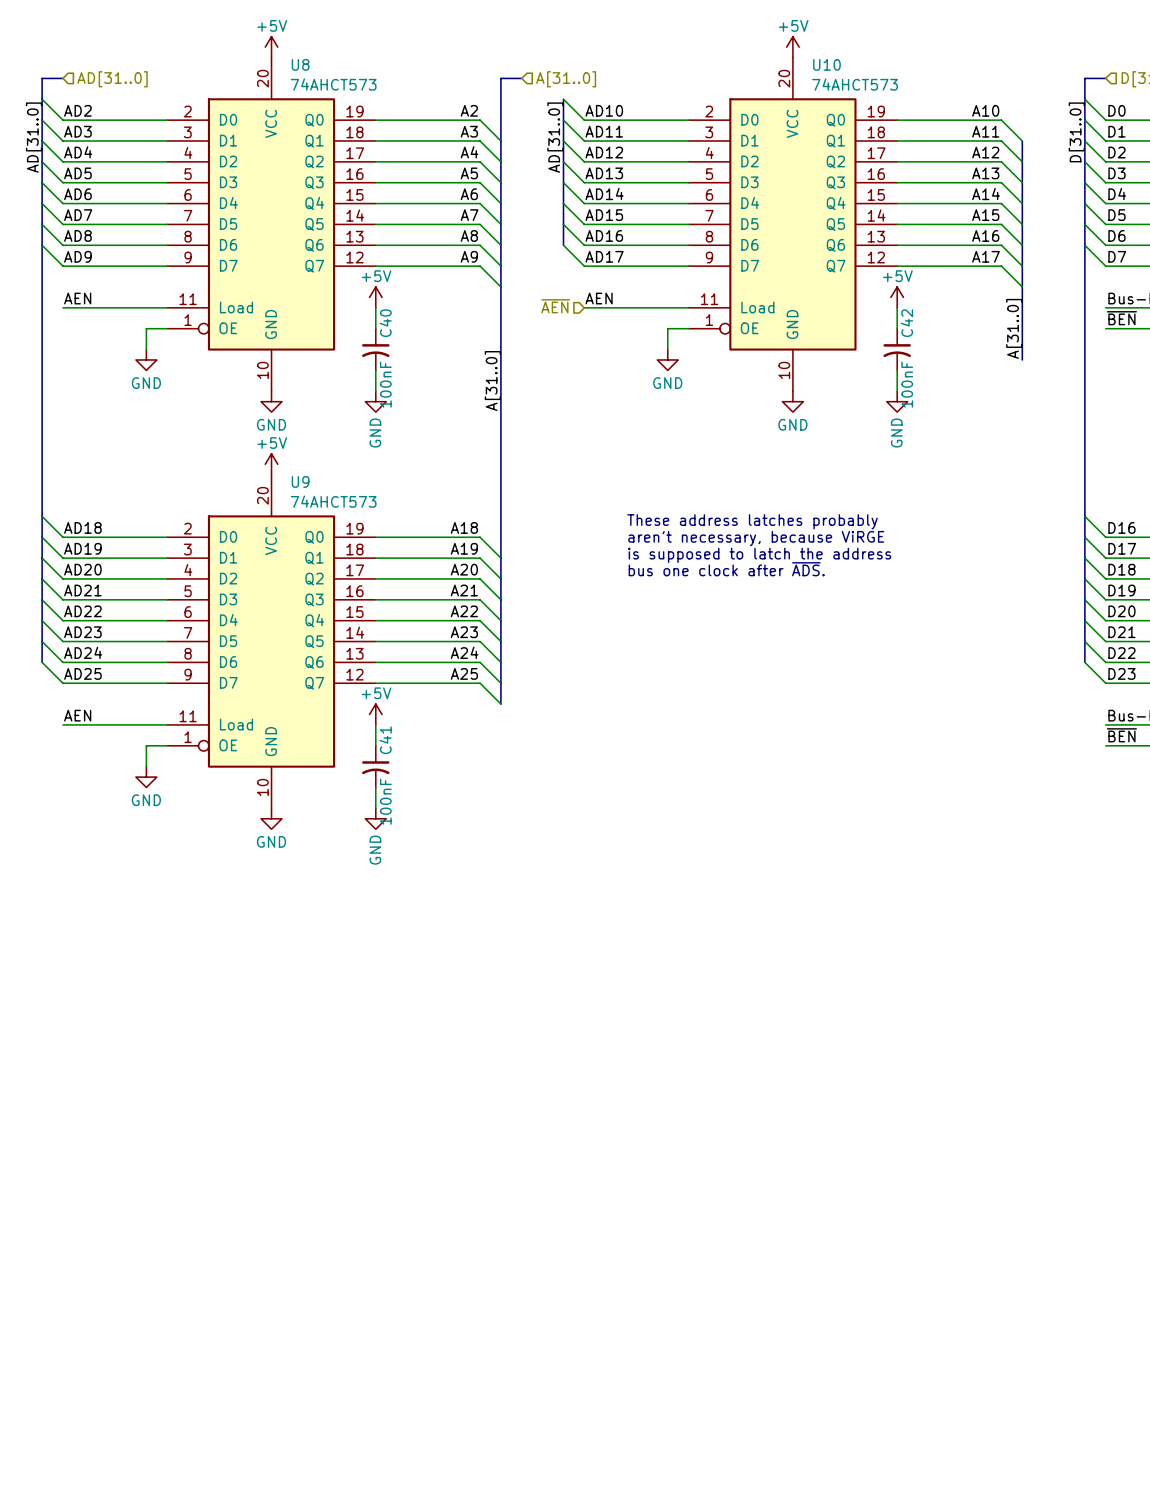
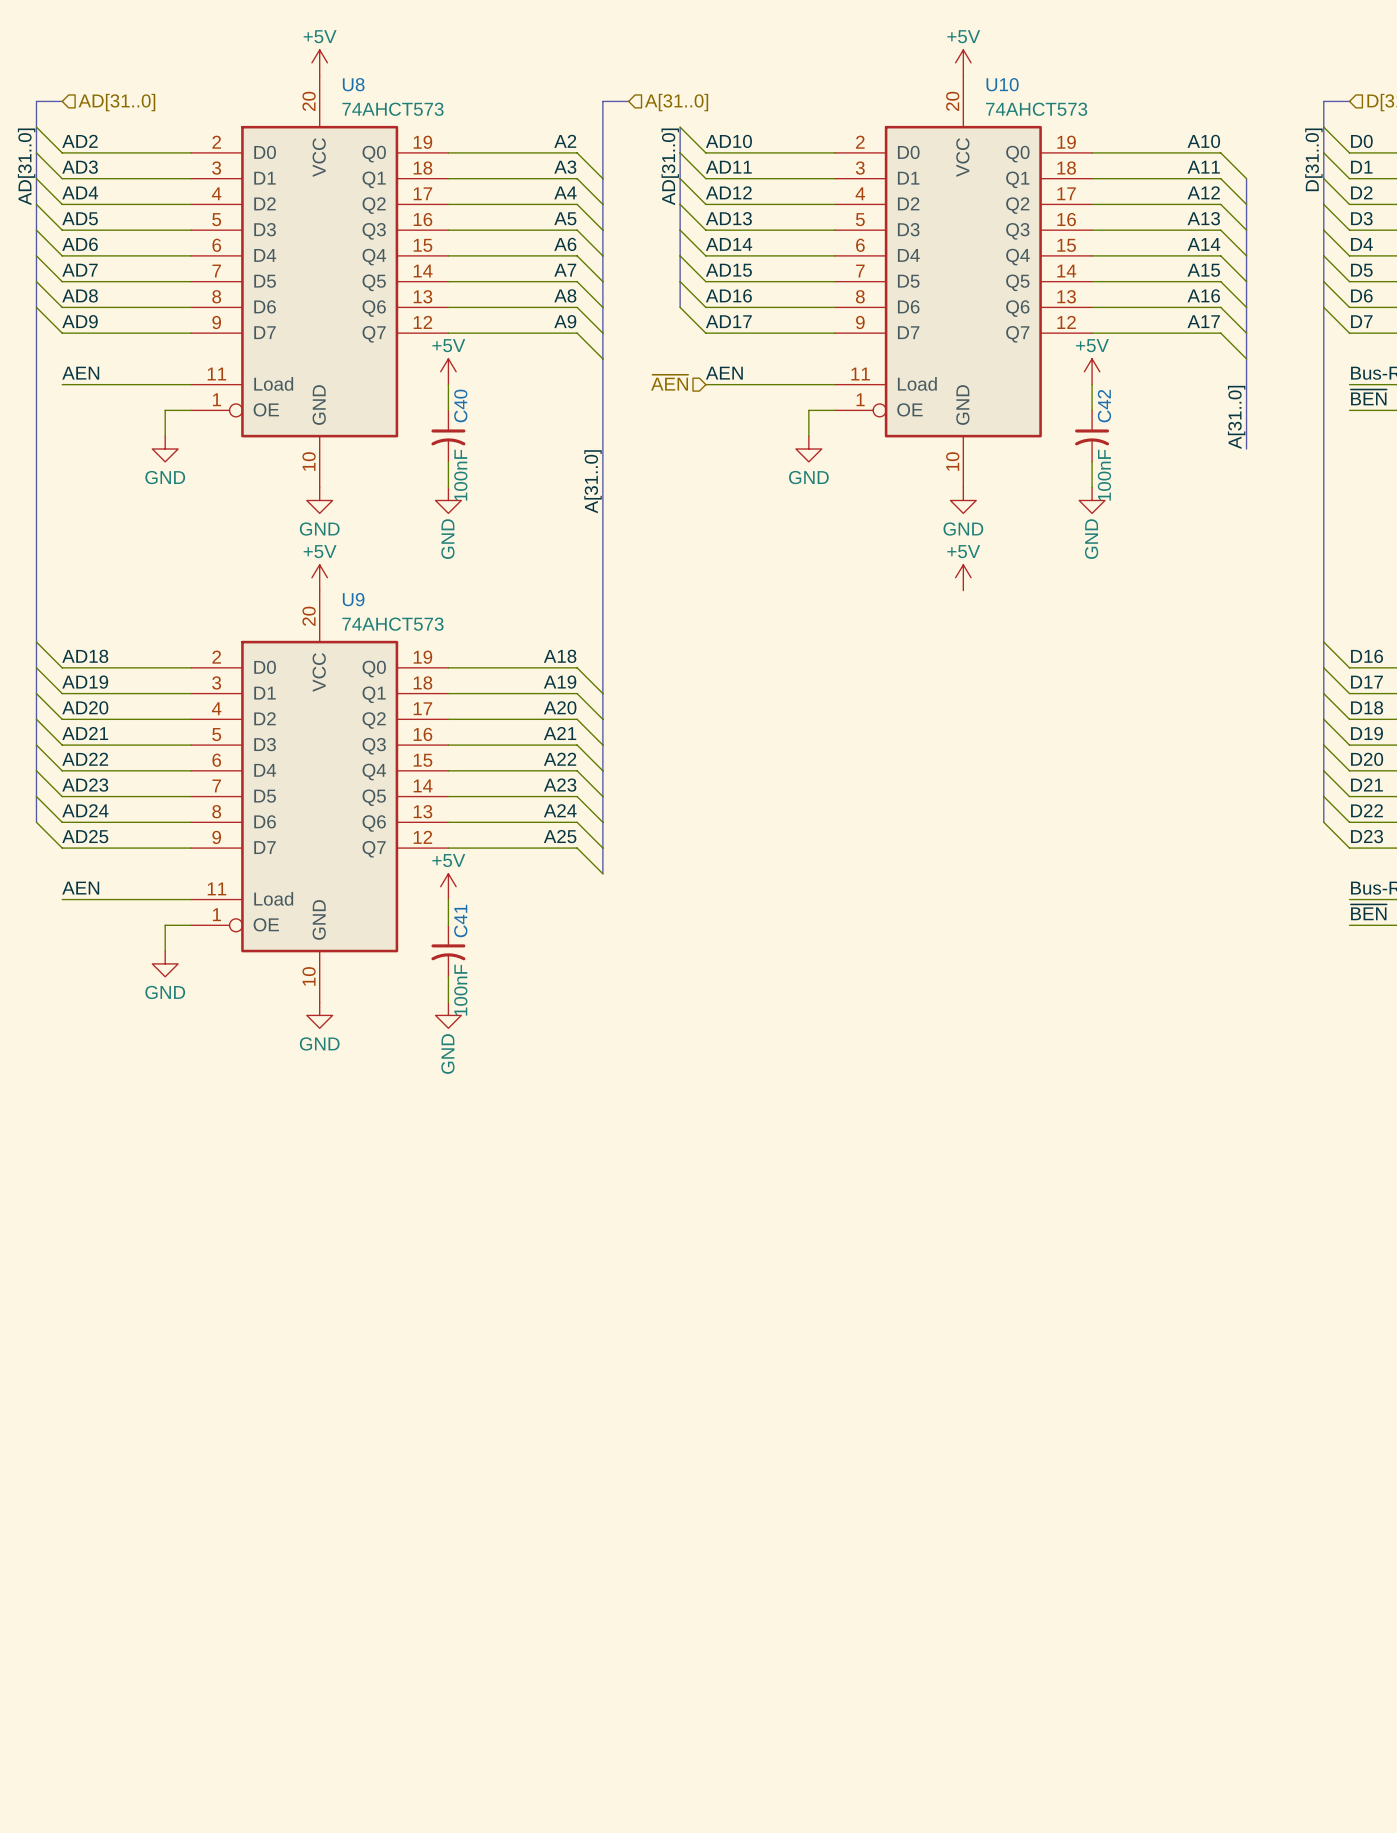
power symbol: none -> +5V (963, 577)
text: These address latches probably (752, 521) -> none
text: aren't necessary, because ViRGE (756, 538) -> none
text: is supposed to latch the address (759, 555) -> none
text: bus one clock after ~{ADS}. (726, 569) -> none

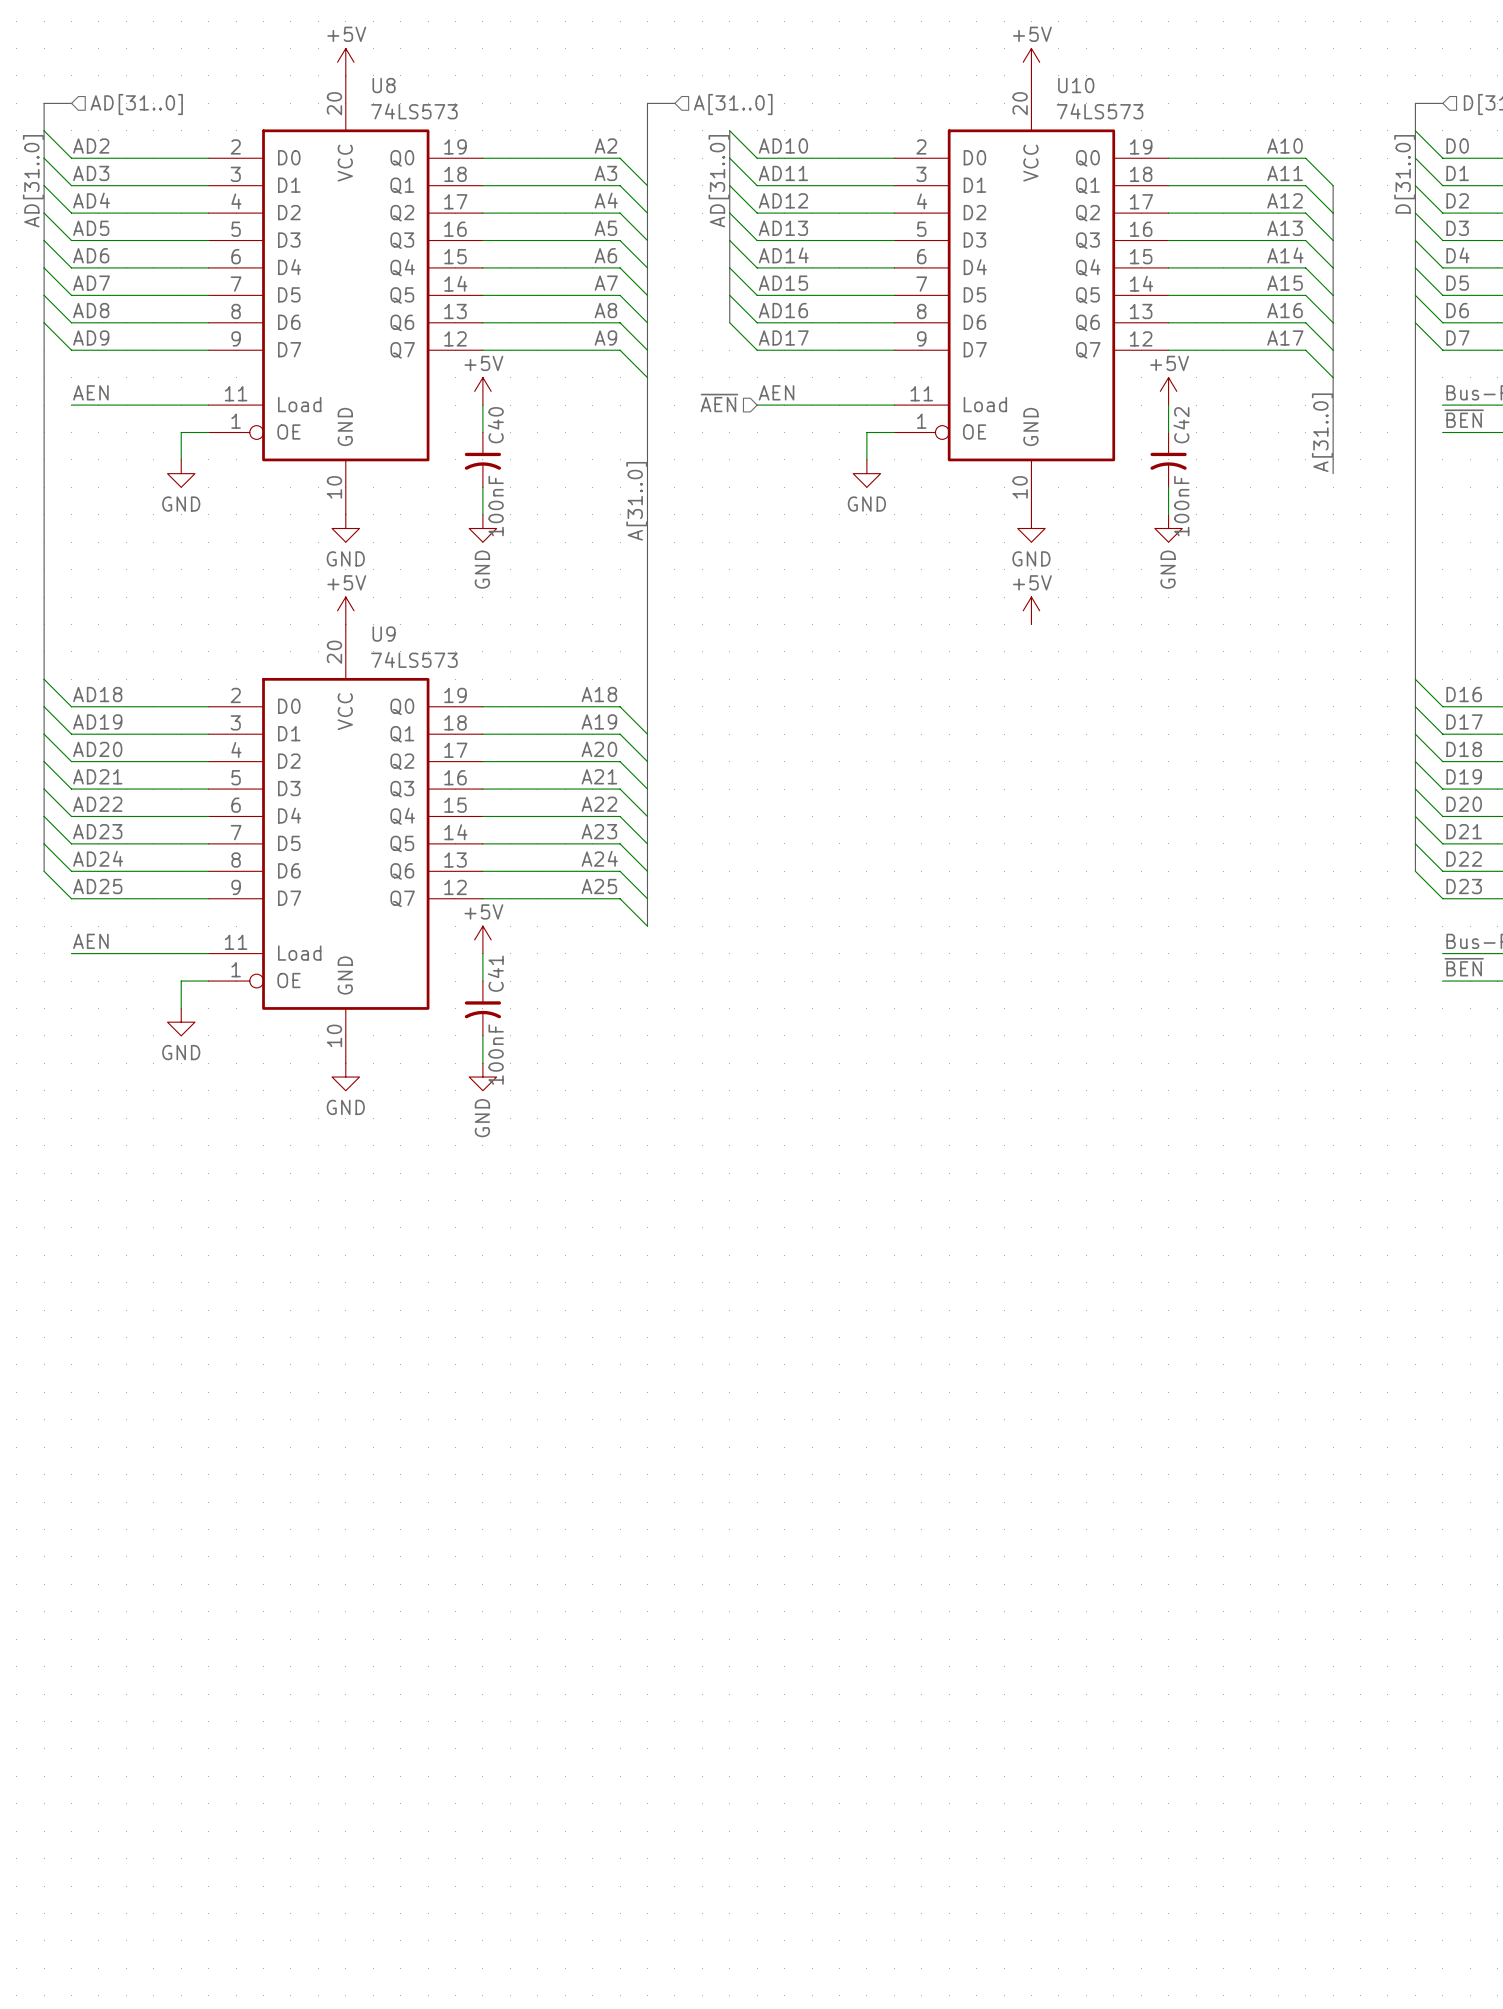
U8 value: 74AHCT573 (392, 109) -> 74LS573 (414, 111)
U10 value: 74AHCT573 (1036, 109) -> 74LS573 (1100, 111)
U9 value: 74AHCT573 (392, 624) -> 74LS573 (414, 659)

